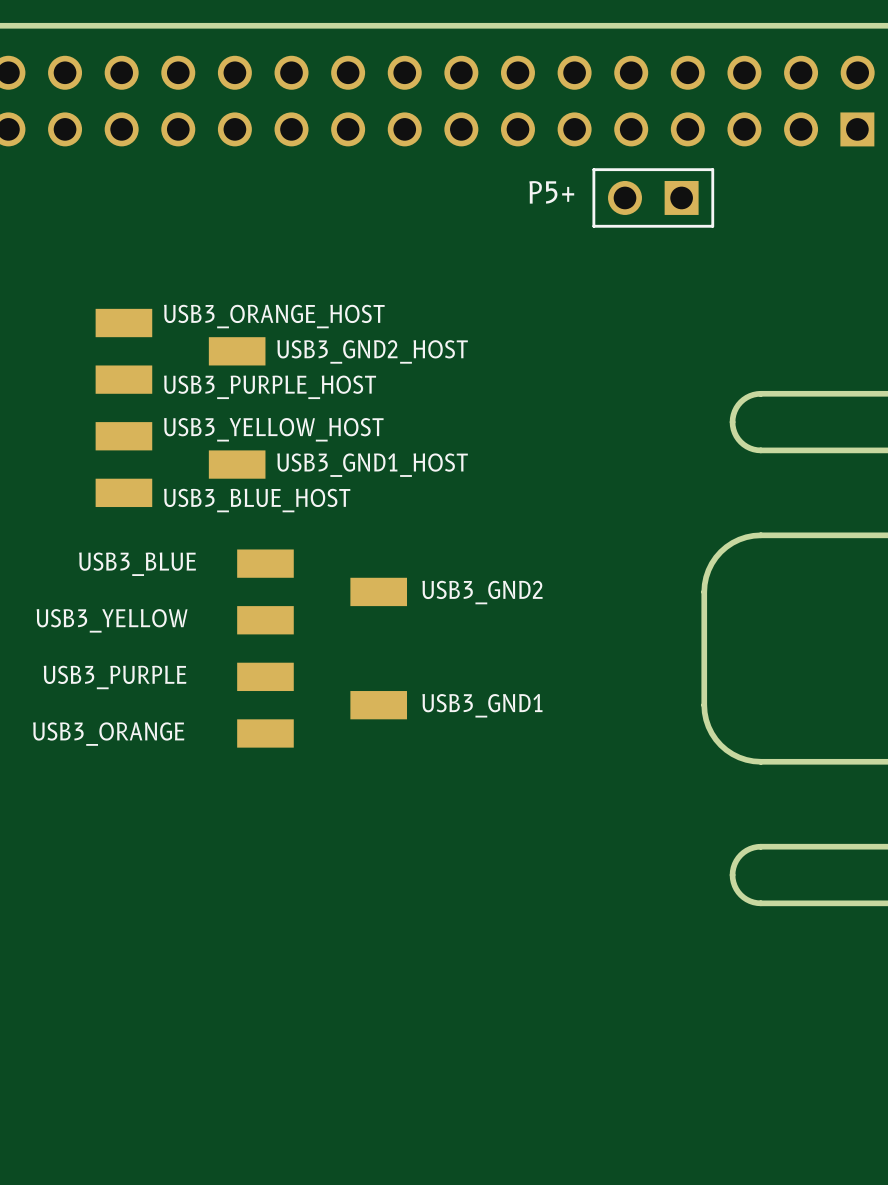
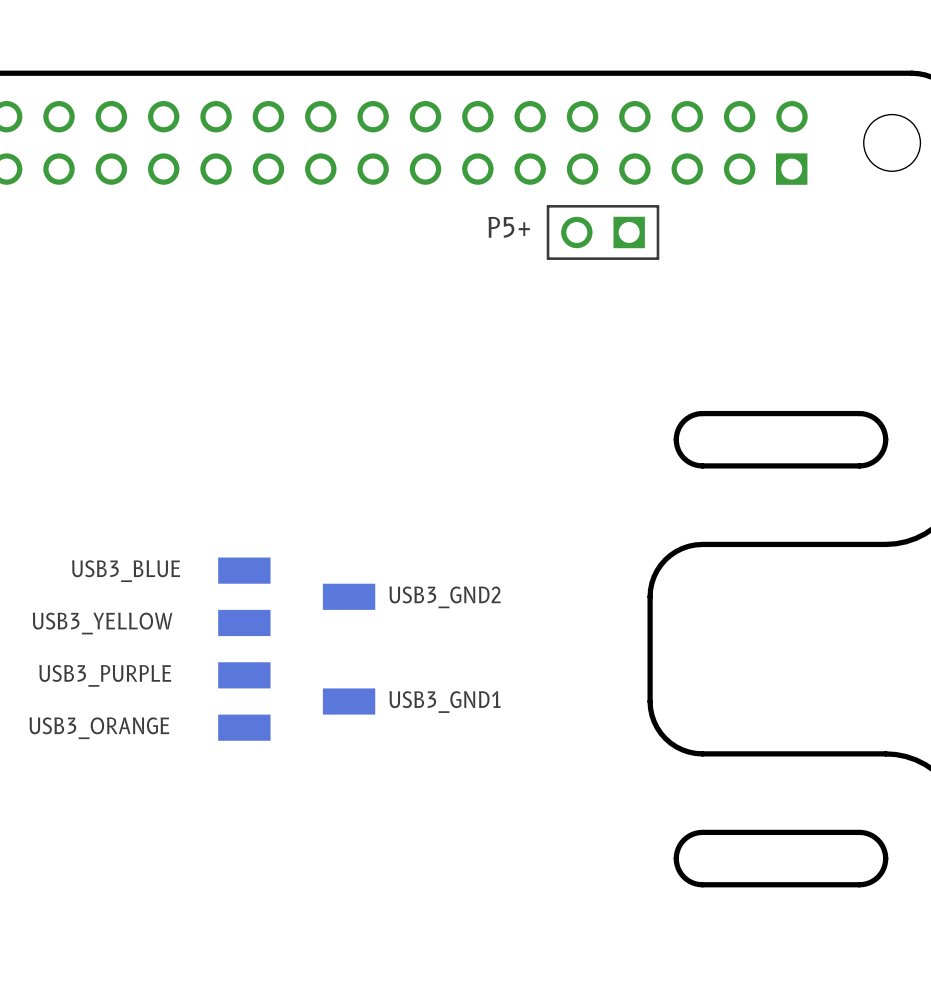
USB3_ORANGE_HOST: (123, 323) -> none
USB3_GND2_HOST: (237, 351) -> none
USB3_PURPLE_HOST: (123, 379) -> none
USB3_YELLOW_HOST: (123, 436) -> none
USB3_GND1_HOST: (237, 464) -> none
USB3_BLUE_HOST: (123, 492) -> none

